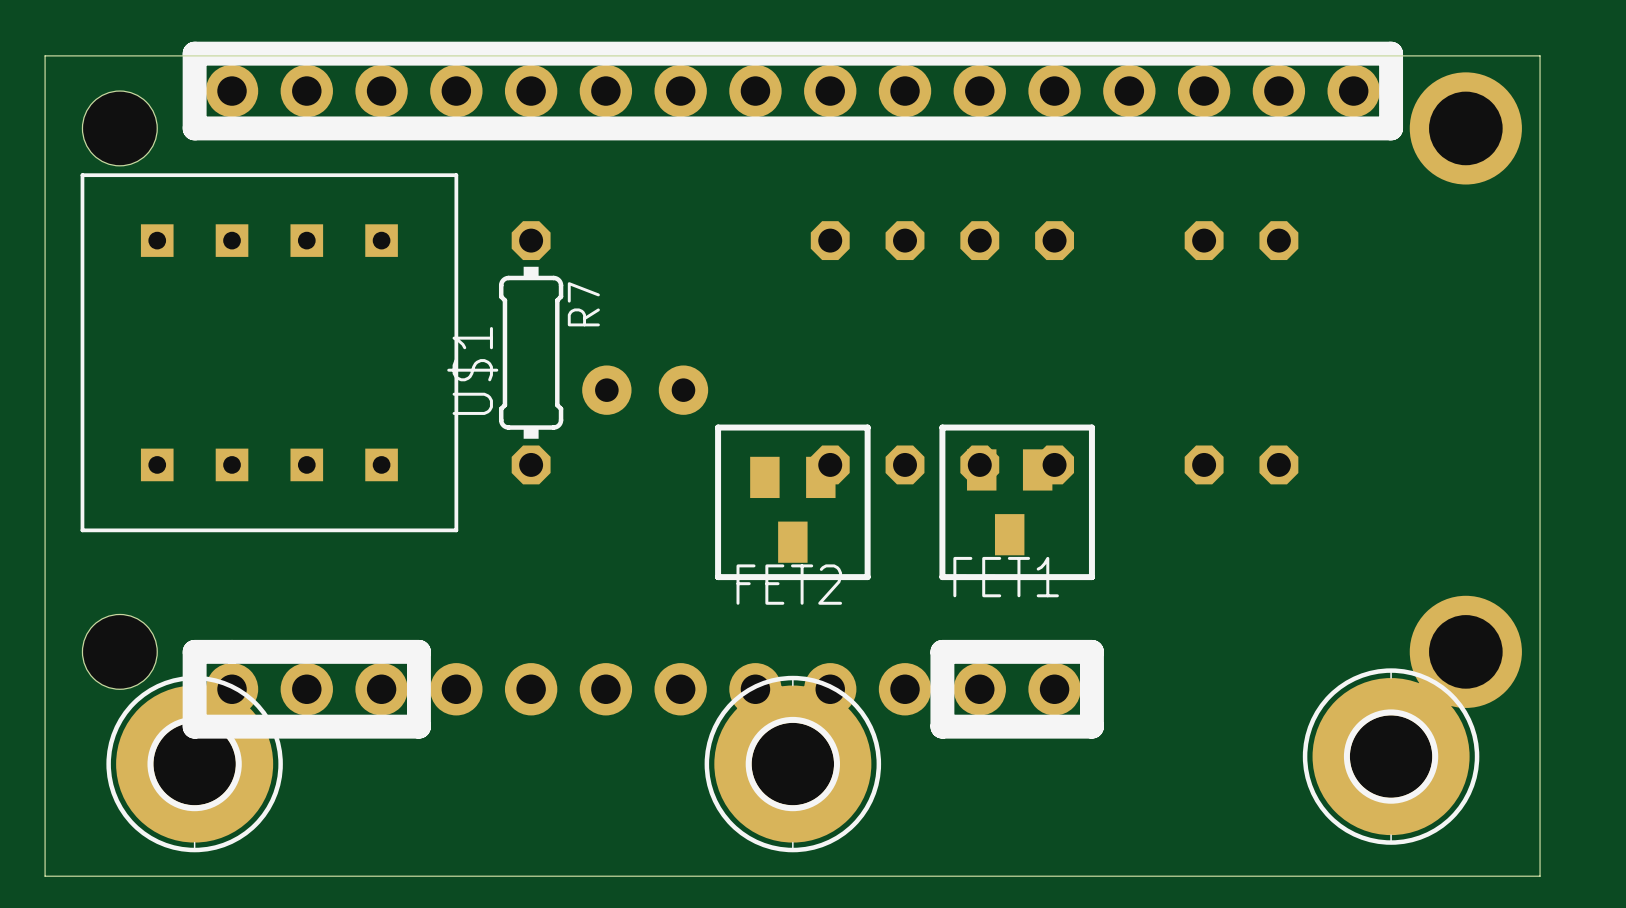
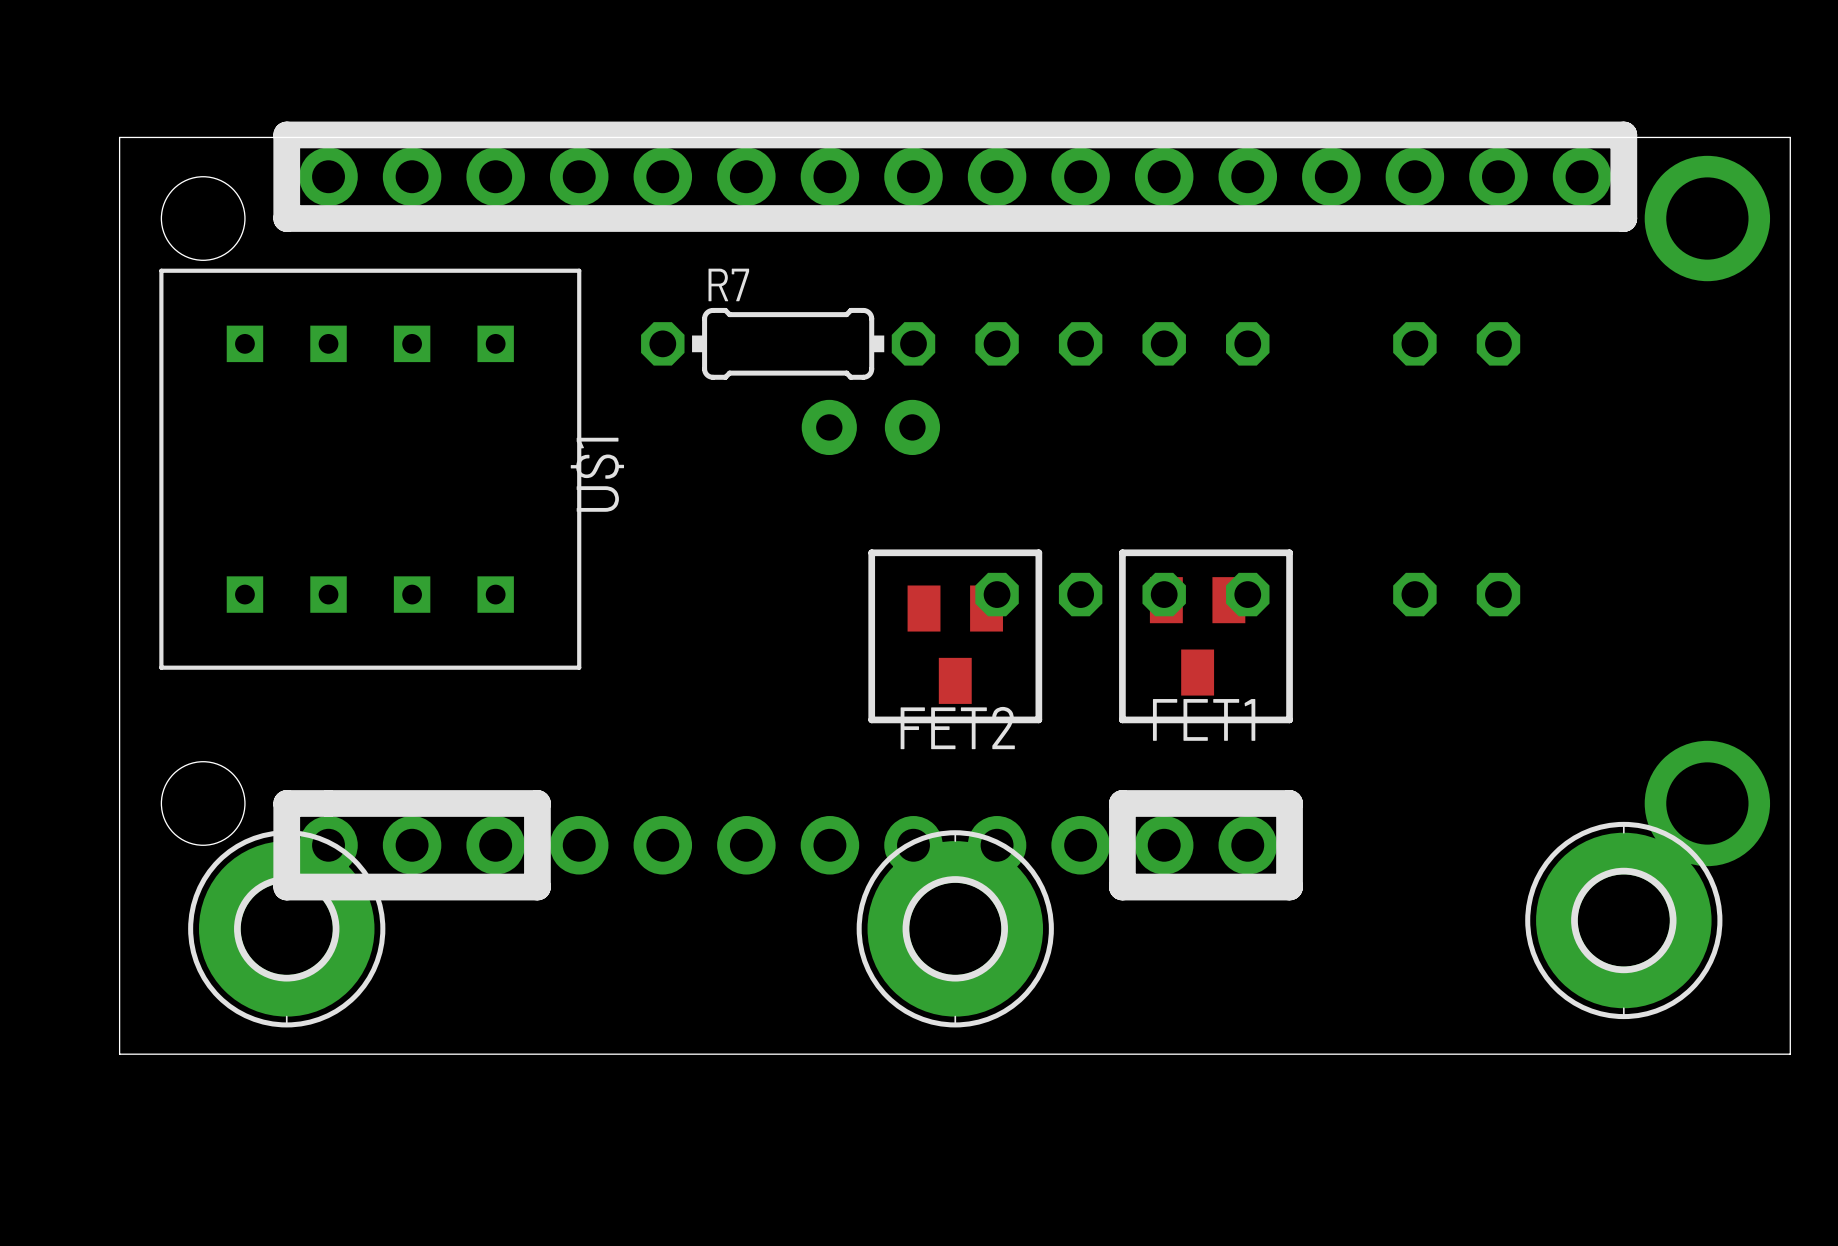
R7 name position: R7 (583, 304) -> R7 (728, 284)
part: none -> (870, 427)
R7 rotation: 0° (531, 352) -> 90° clockwise (788, 343)
R7 position: (531, 352) -> (788, 343)
part: (645, 390) -> none

